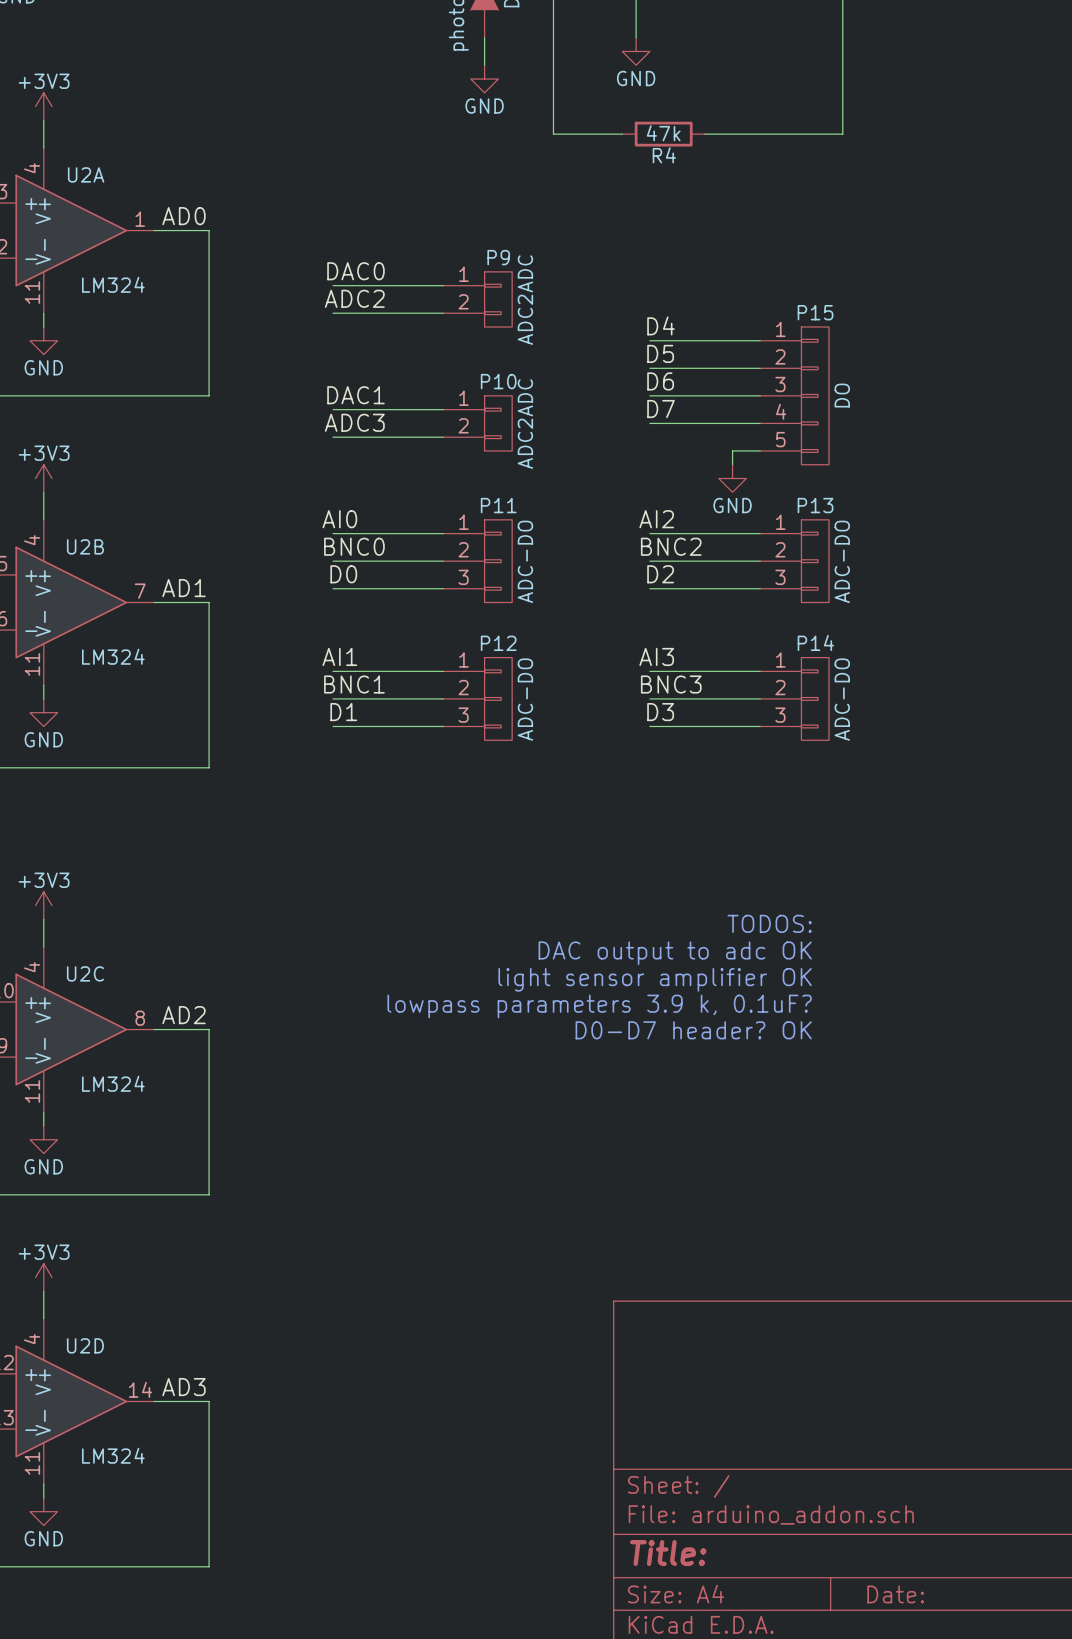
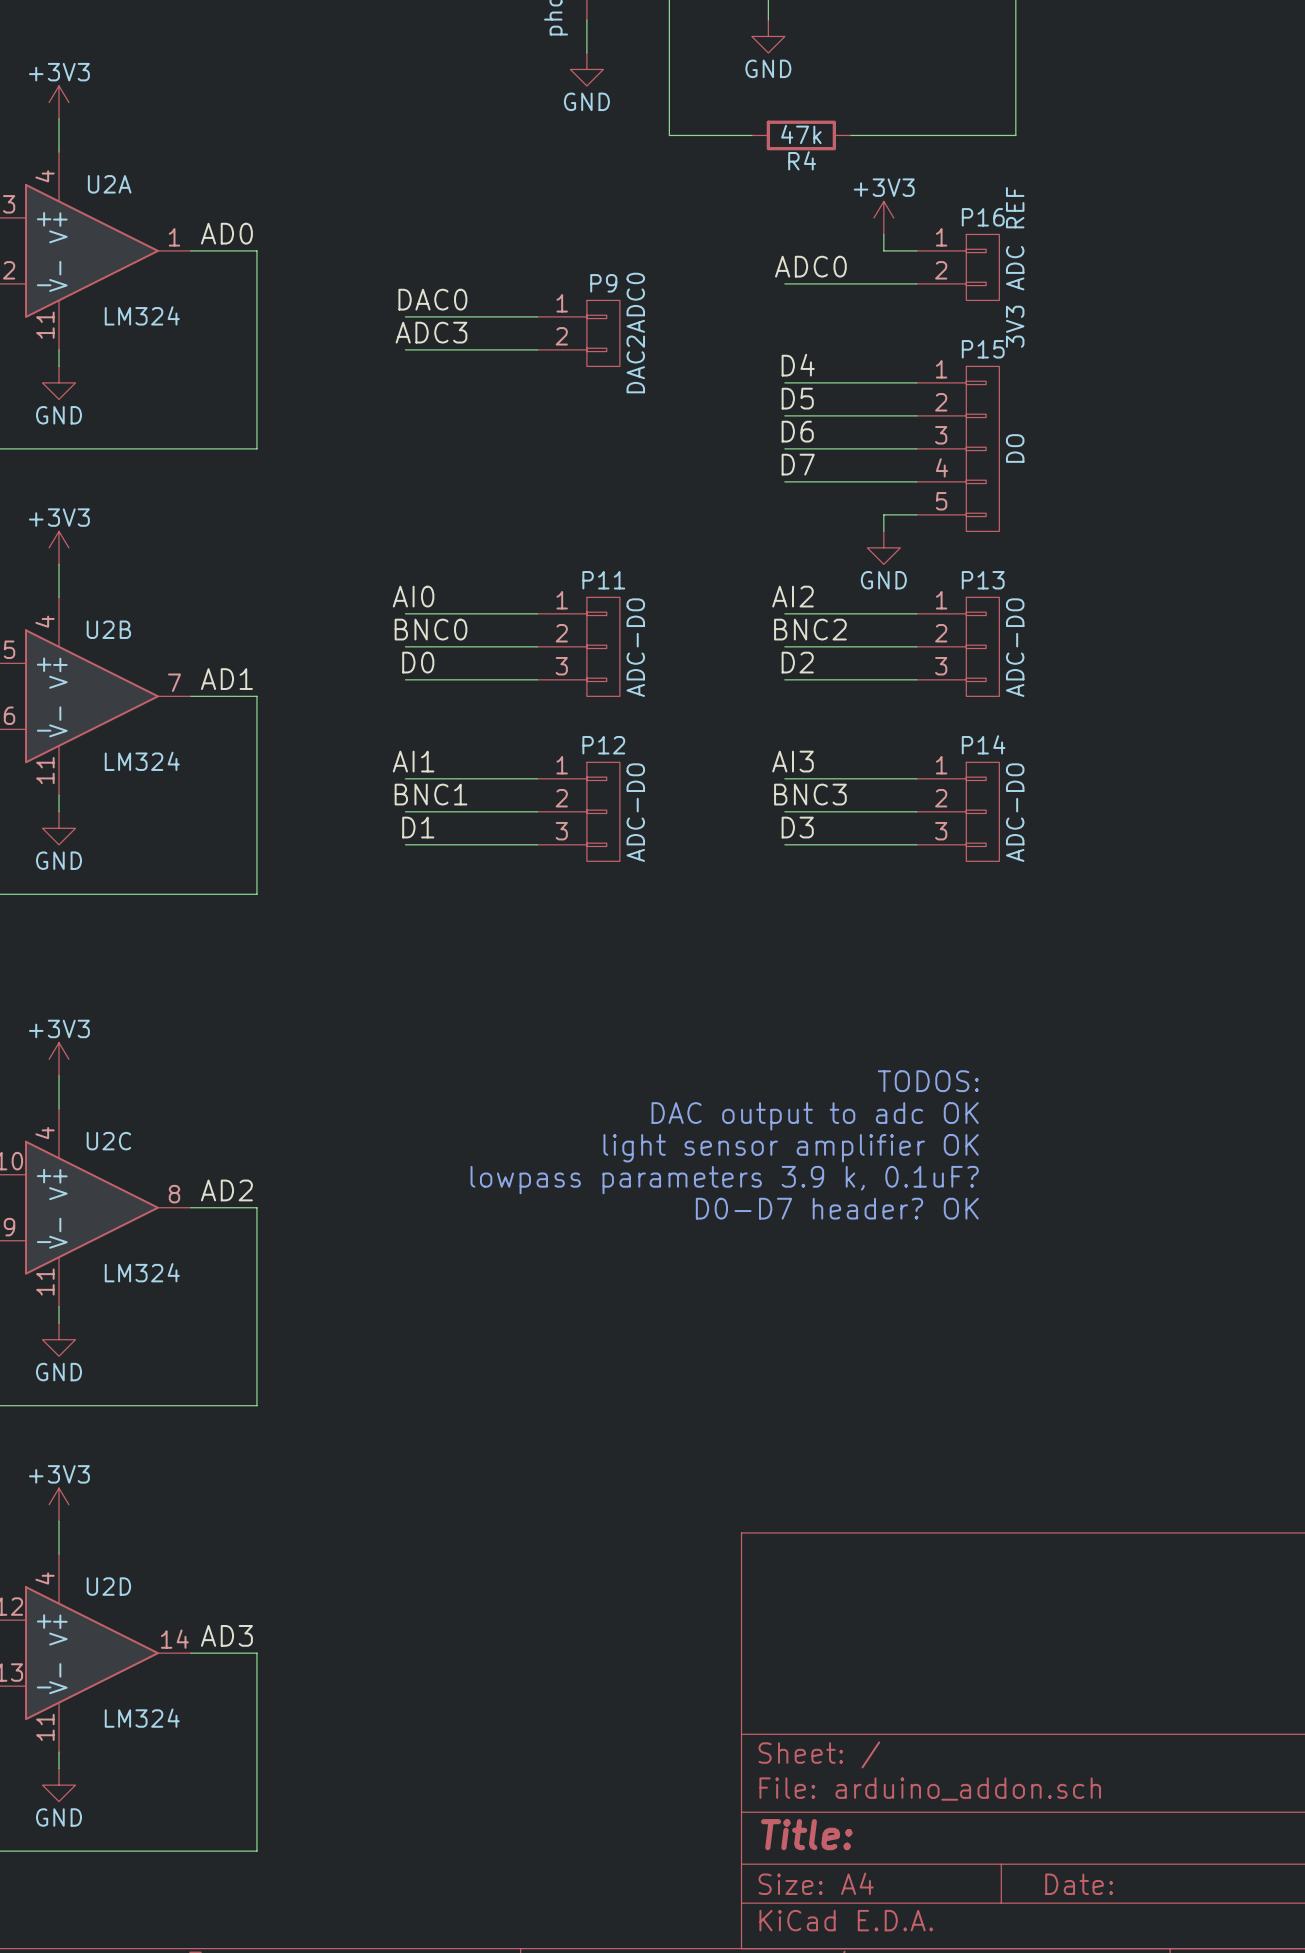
power symbol: none -> +3V3 (883, 217)
wire: none -> (883, 234) (883, 250) (916, 250)
label: none -> ADC0 (810, 266)
P16: none -> 3V3 ADC REF (958, 267)
wire: none -> (784, 283) (916, 283)
label: ADC2 (354, 298) -> ADC3 (431, 332)
P9 value: ADC2ADC (525, 300) -> DAC2ADC0 (635, 333)
label: DAC1 (355, 395) -> none
wire: (333, 409) (443, 409) -> none
label: ADC3 (354, 422) -> none
P10: ADC2ADC (477, 423) -> none
wire: (333, 437) (443, 437) -> none

